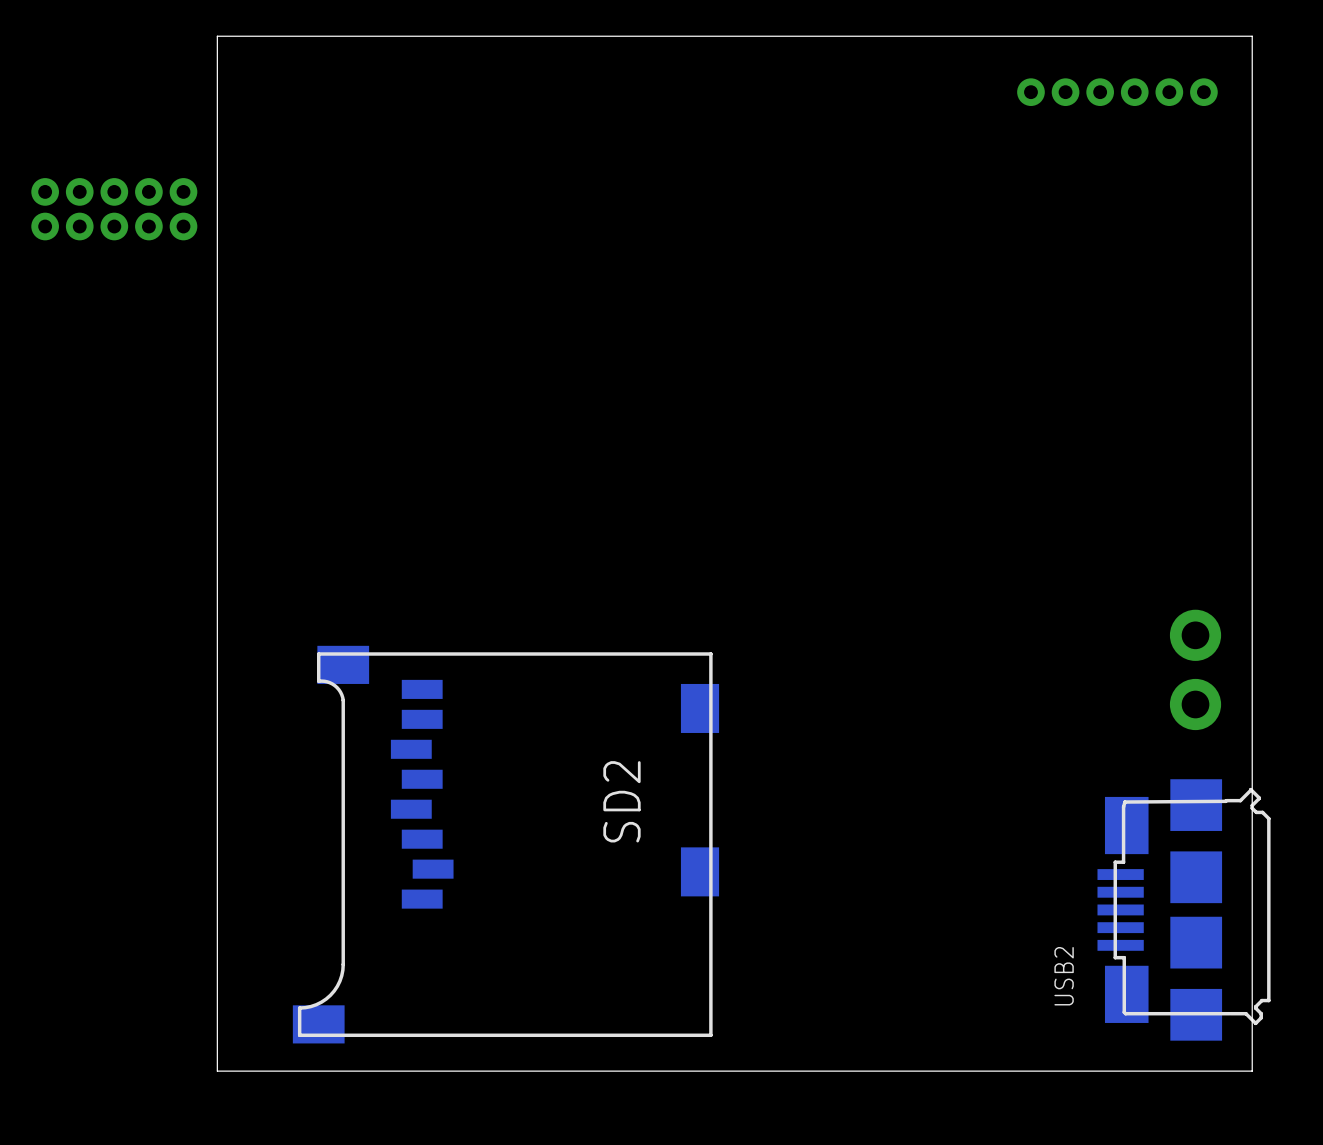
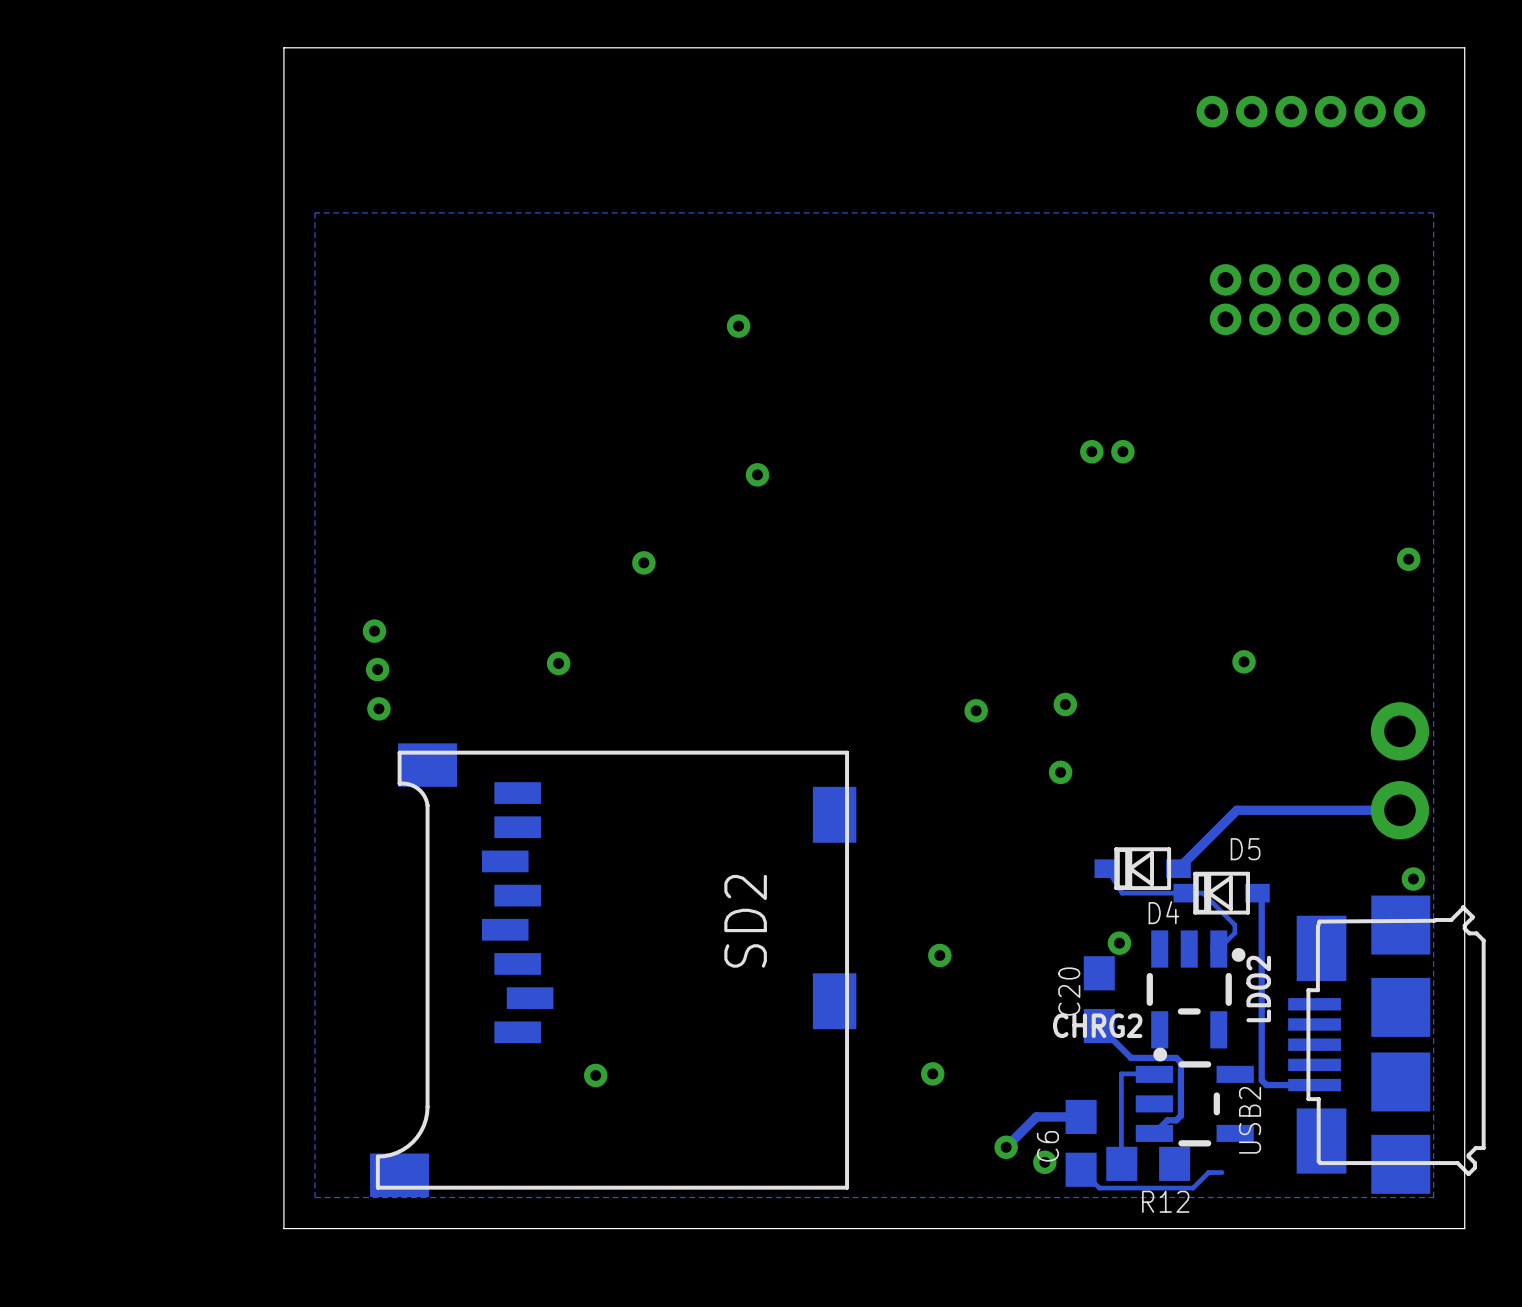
zone outline: none -> (1433, 212) (315, 212) (315, 1197) (1433, 1197) (1433, 212)
part: (114, 209) -> none
part: none -> (1304, 299)
via: none -> (738, 326)
via: none -> (1091, 451)
via: none -> (1122, 451)
via: none -> (757, 474)
via: none -> (1408, 559)
via: none -> (643, 562)
via: none -> (374, 631)
via: none -> (1244, 661)
via: none -> (558, 663)
via: none -> (377, 669)
via: none -> (1065, 704)
via: none -> (378, 708)
via: none -> (976, 710)
via: none -> (1060, 772)
track: none -> (1399, 810) (1236, 810) (1178, 868)
track: none -> (1106, 868) (1122, 893) (1202, 893) (1234, 925) (1234, 932) (1218, 949) (1212, 949)
D4: none -> (1142, 868)
via: none -> (1413, 879)
D5: none -> (1221, 893)
track: none -> (1257, 893) (1261, 897) (1261, 1080) (1266, 1085) (1314, 1085)
via: none -> (1119, 943)
via: none -> (939, 955)
LDO2: none -> (1196, 989)
C20: none -> (1099, 999)
track: none -> (1099, 1026) (1131, 1057) (1176, 1057) (1180, 1062) (1180, 1115) (1176, 1120) (1167, 1120) (1154, 1133)
via: none -> (932, 1073)
track: none -> (1154, 1074) (1121, 1073) (1121, 1163)
via: none -> (595, 1075)
CHRG2: none -> (1194, 1097)
track: none -> (1081, 1116) (1036, 1116) (1006, 1147)
C6: none -> (1081, 1143)
via: none -> (1006, 1147)
via: none -> (1044, 1162)
R12: none -> (1148, 1163)
track: none -> (1081, 1169) (1099, 1188) (1193, 1188) (1208, 1172) (1222, 1172)

